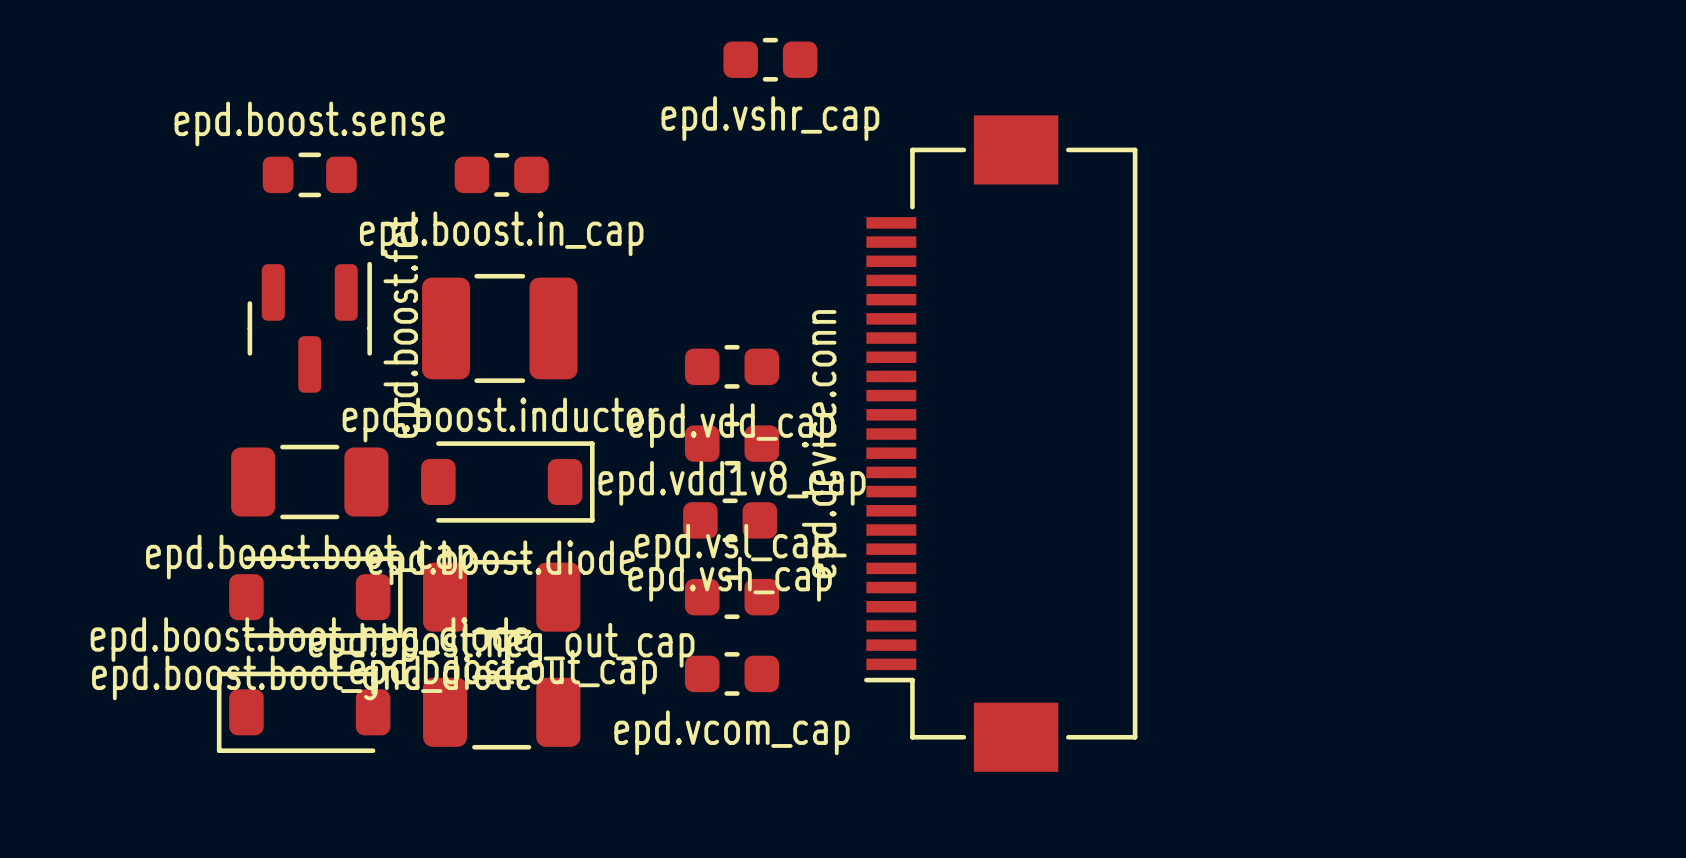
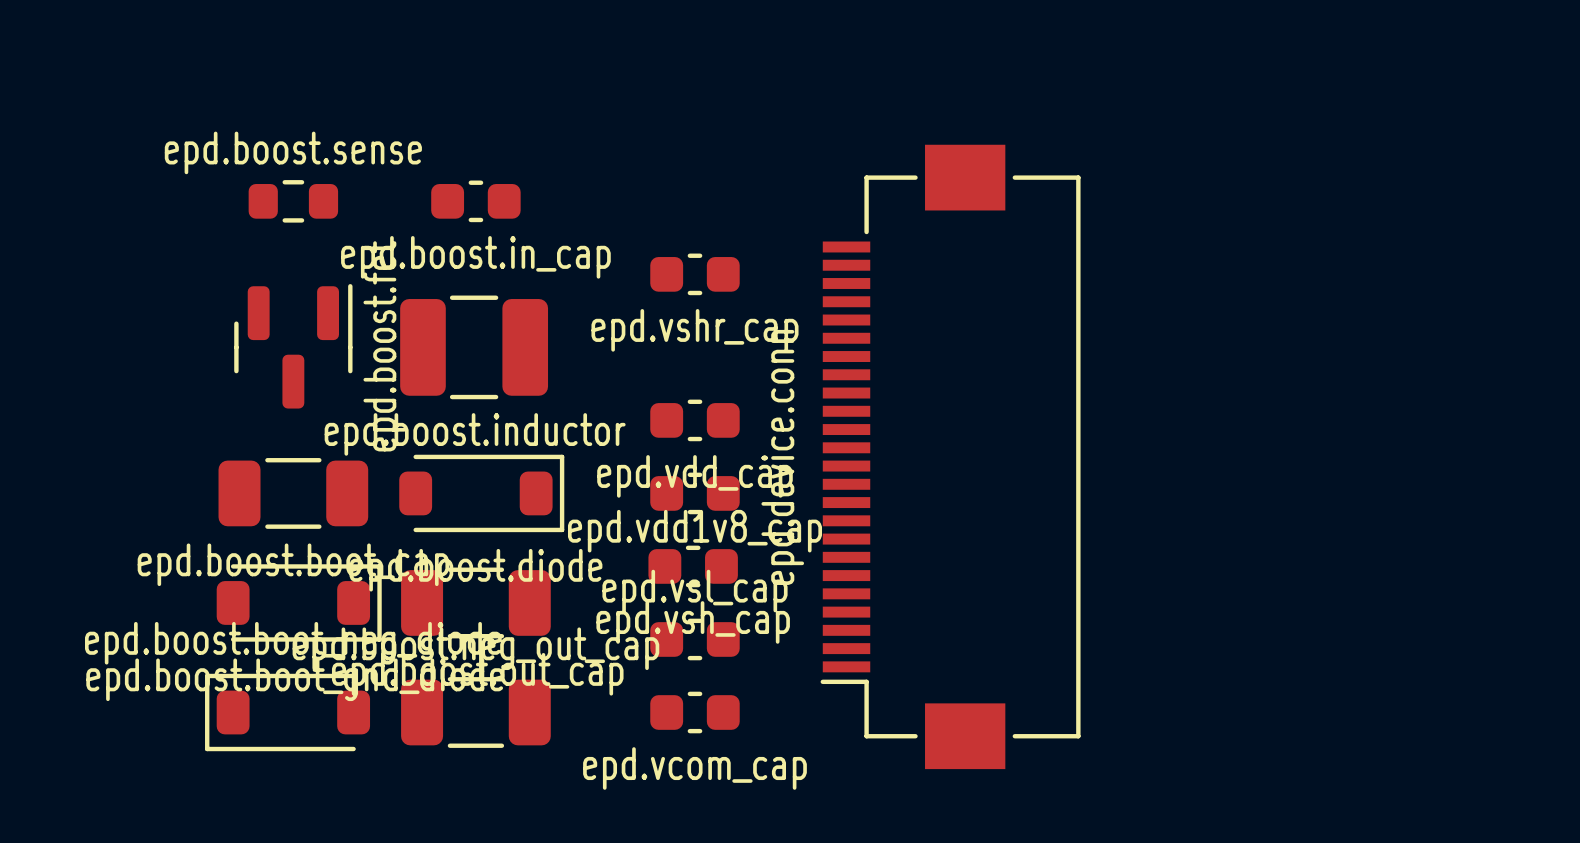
epd.vshr_cap position: (770, 59) -> (694, 274)
epd.vdd_cap position: (732, 366) -> (694, 420)
epd.vdd1v8_cap position: (732, 443) -> (694, 493)
epd.vsh_cap position: (730, 520) -> (693, 566)
epd.vsl_cap position: (732, 597) -> (694, 639)
epd.vcom_cap position: (732, 673) -> (694, 712)

